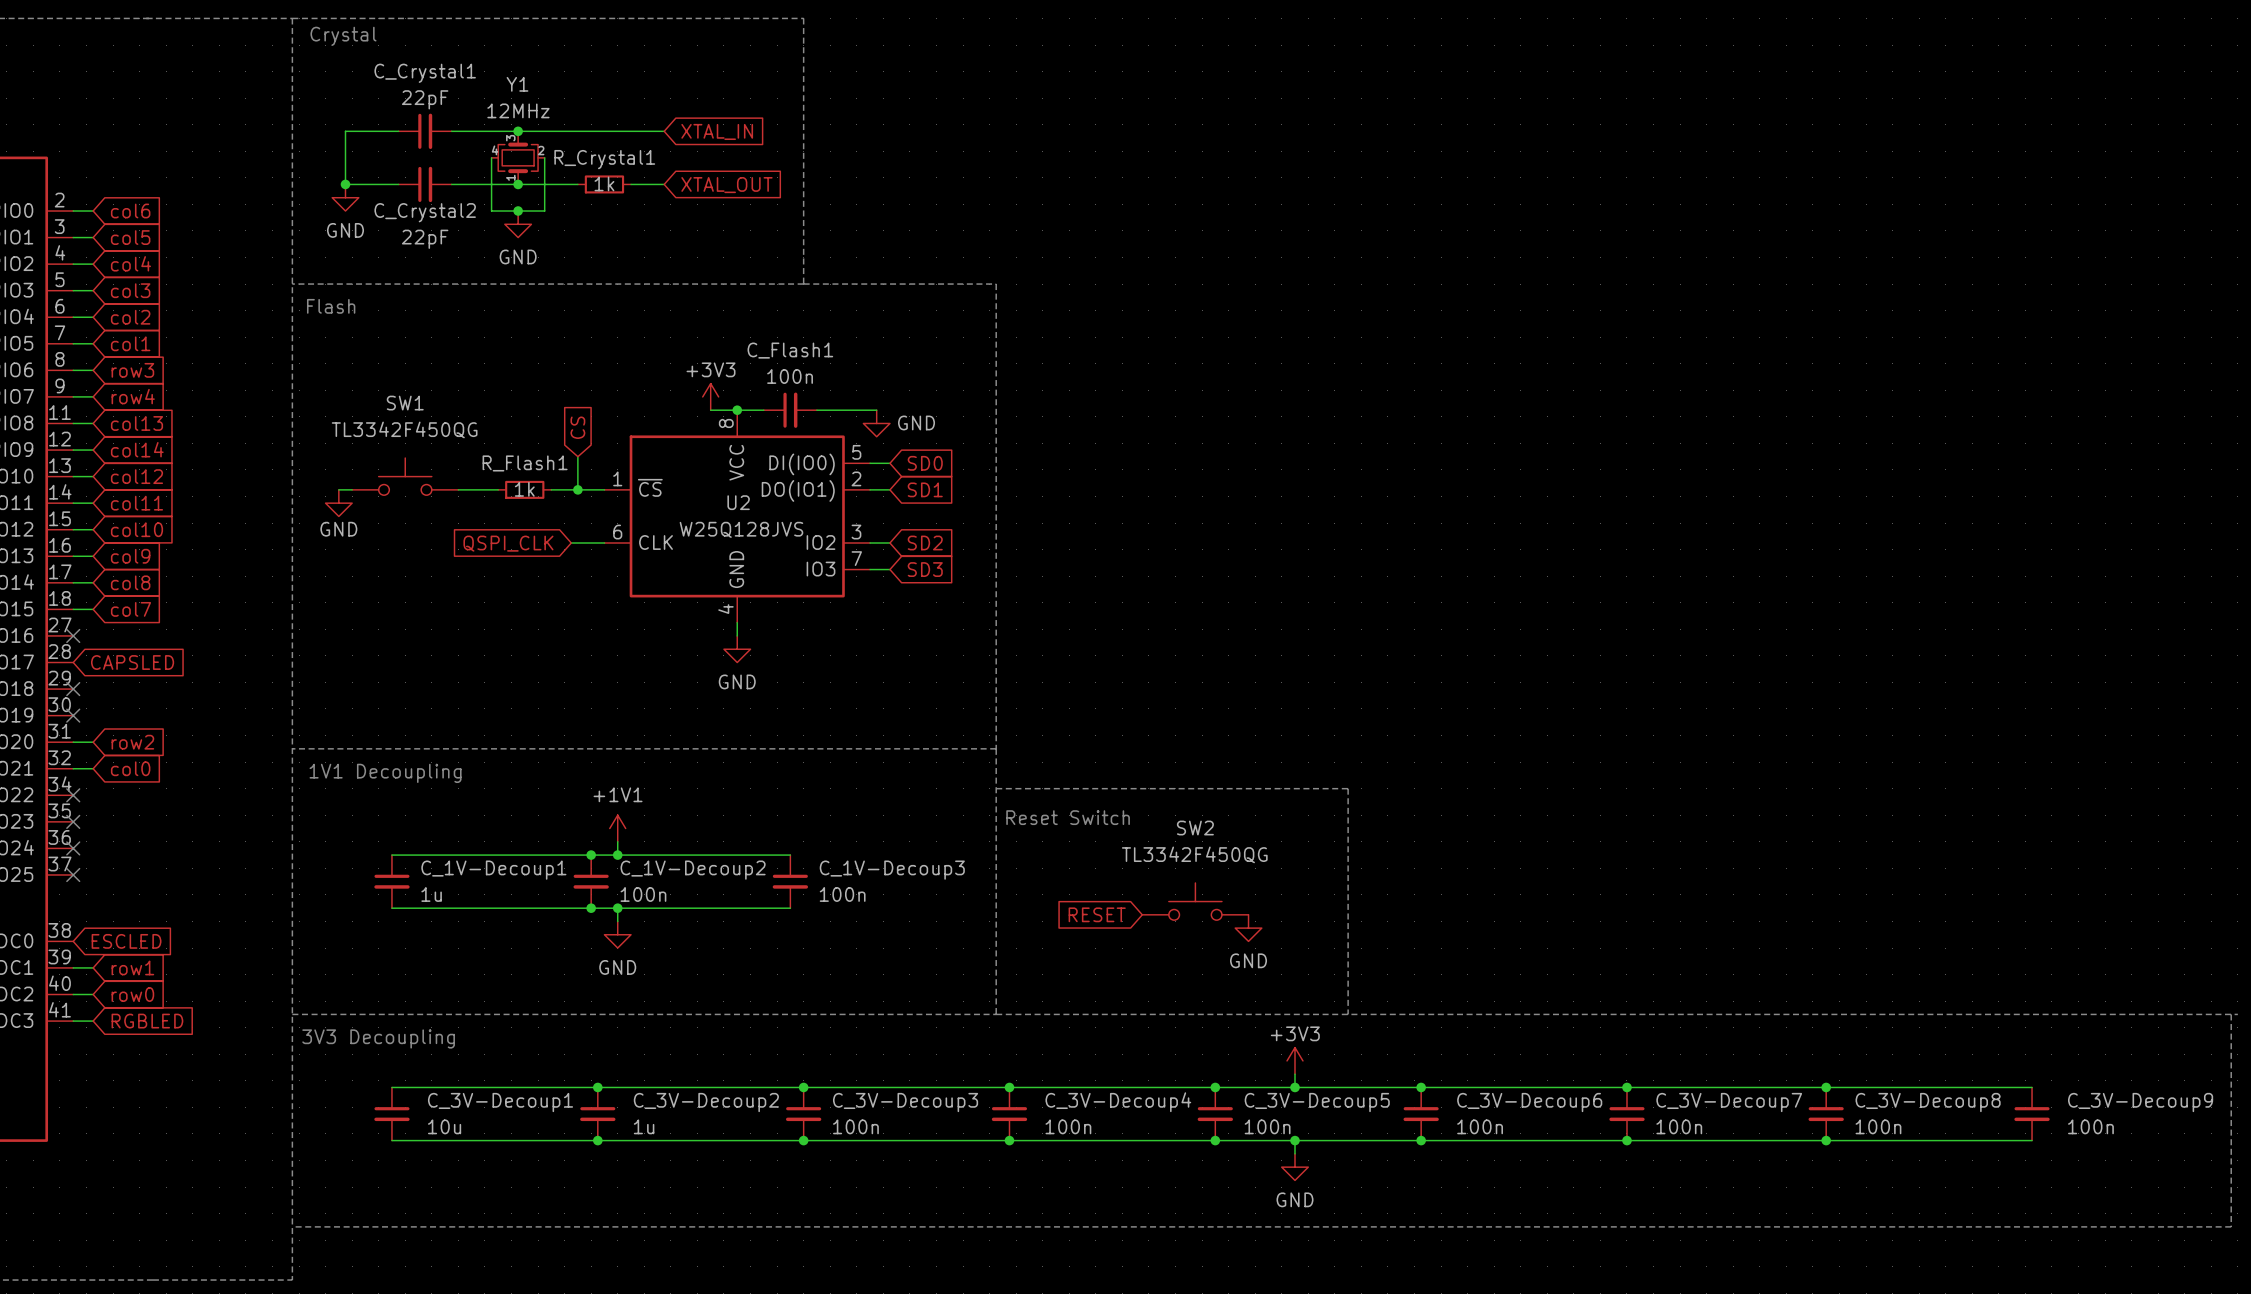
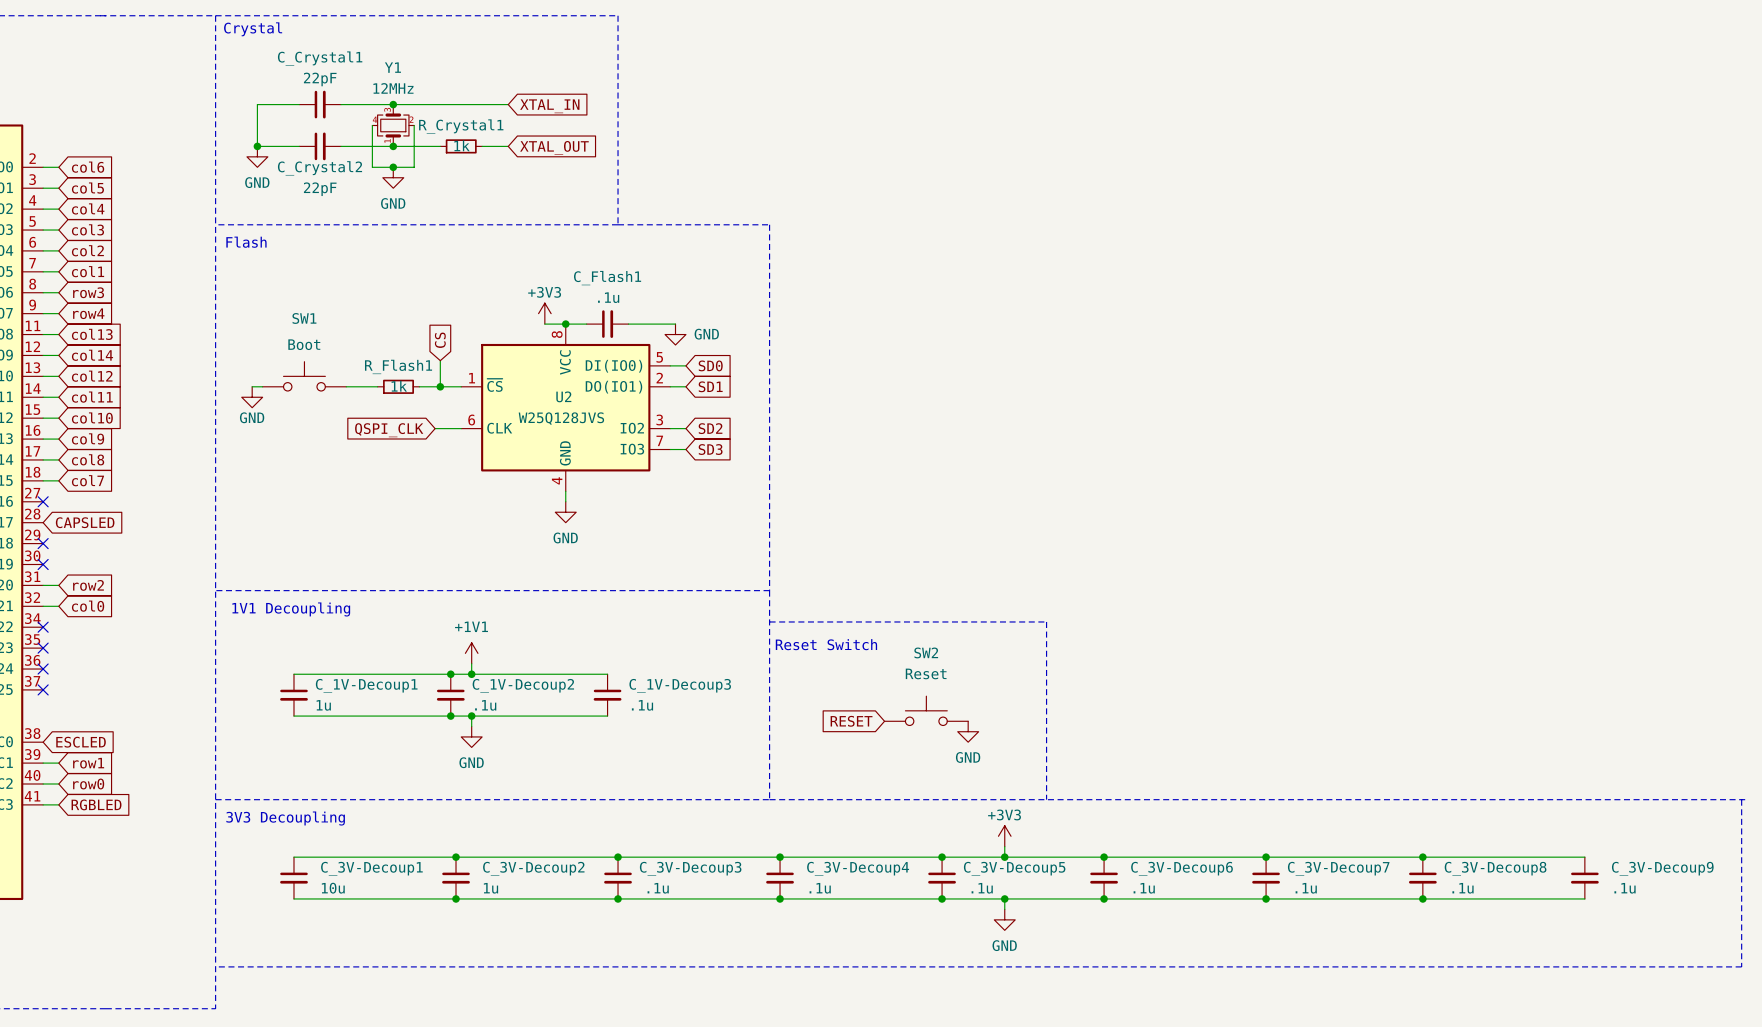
C_Flash1 value: 100n (790, 376) -> .1u (608, 297)
SW1 value: TL3342F450QG (404, 429) -> Boot (304, 344)
SW2 value: TL3342F450QG (1194, 854) -> Reset (926, 673)
C_1V-Decoup2 value: 100n (643, 894) -> .1u (485, 705)
C_1V-Decoup3 value: 100n (842, 894) -> .1u (642, 705)
C_3V-Decoup3 value: 100n (855, 1126) -> .1u (658, 888)
C_3V-Decoup4 value: 100n (1068, 1126) -> .1u (820, 888)
C_3V-Decoup5 value: 100n (1267, 1126) -> .1u (982, 888)
C_3V-Decoup6 value: 100n (1480, 1126) -> .1u (1144, 888)
C_3V-Decoup7 value: 100n (1679, 1126) -> .1u (1306, 888)
C_3V-Decoup8 value: 100n (1878, 1126) -> .1u (1463, 888)
C_3V-Decoup9 value: 100n (2090, 1126) -> .1u (1625, 888)

